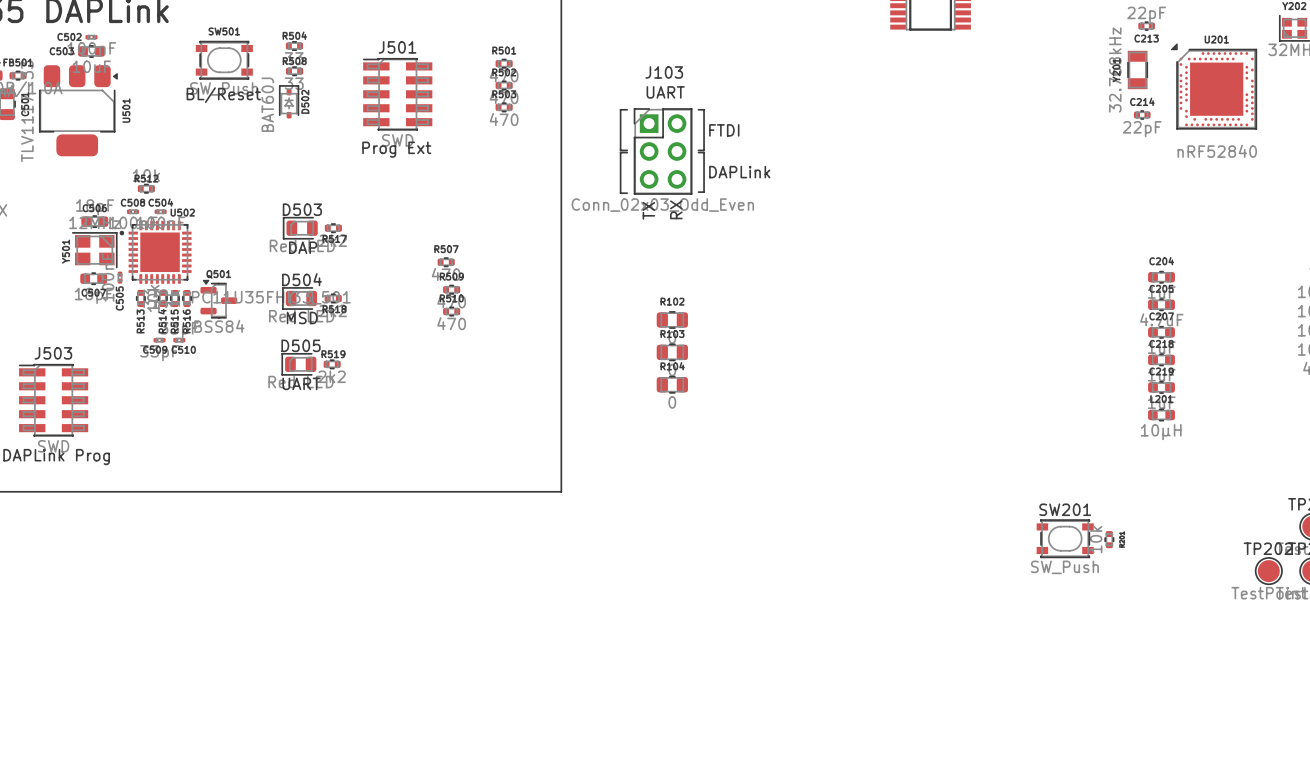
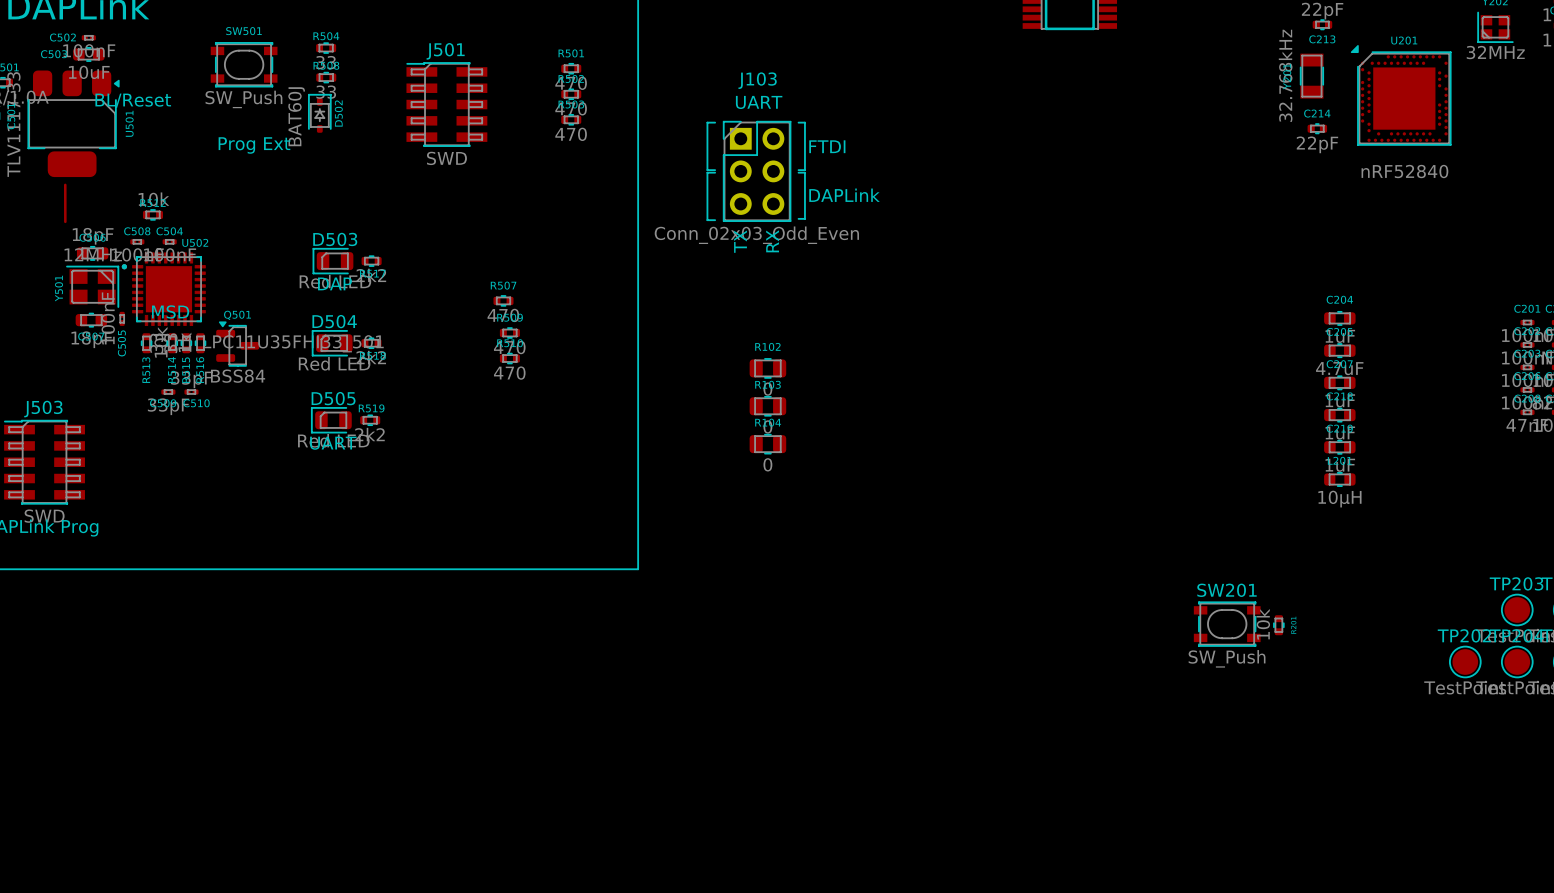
text position: BL/Reset (223, 95) -> BL/Reset (133, 100)
text position: Prog Ext (396, 149) -> Prog Ext (254, 145)
top track: none -> (65, 184) (65, 221)
text position: MSD (302, 317) -> MSD (170, 311)

